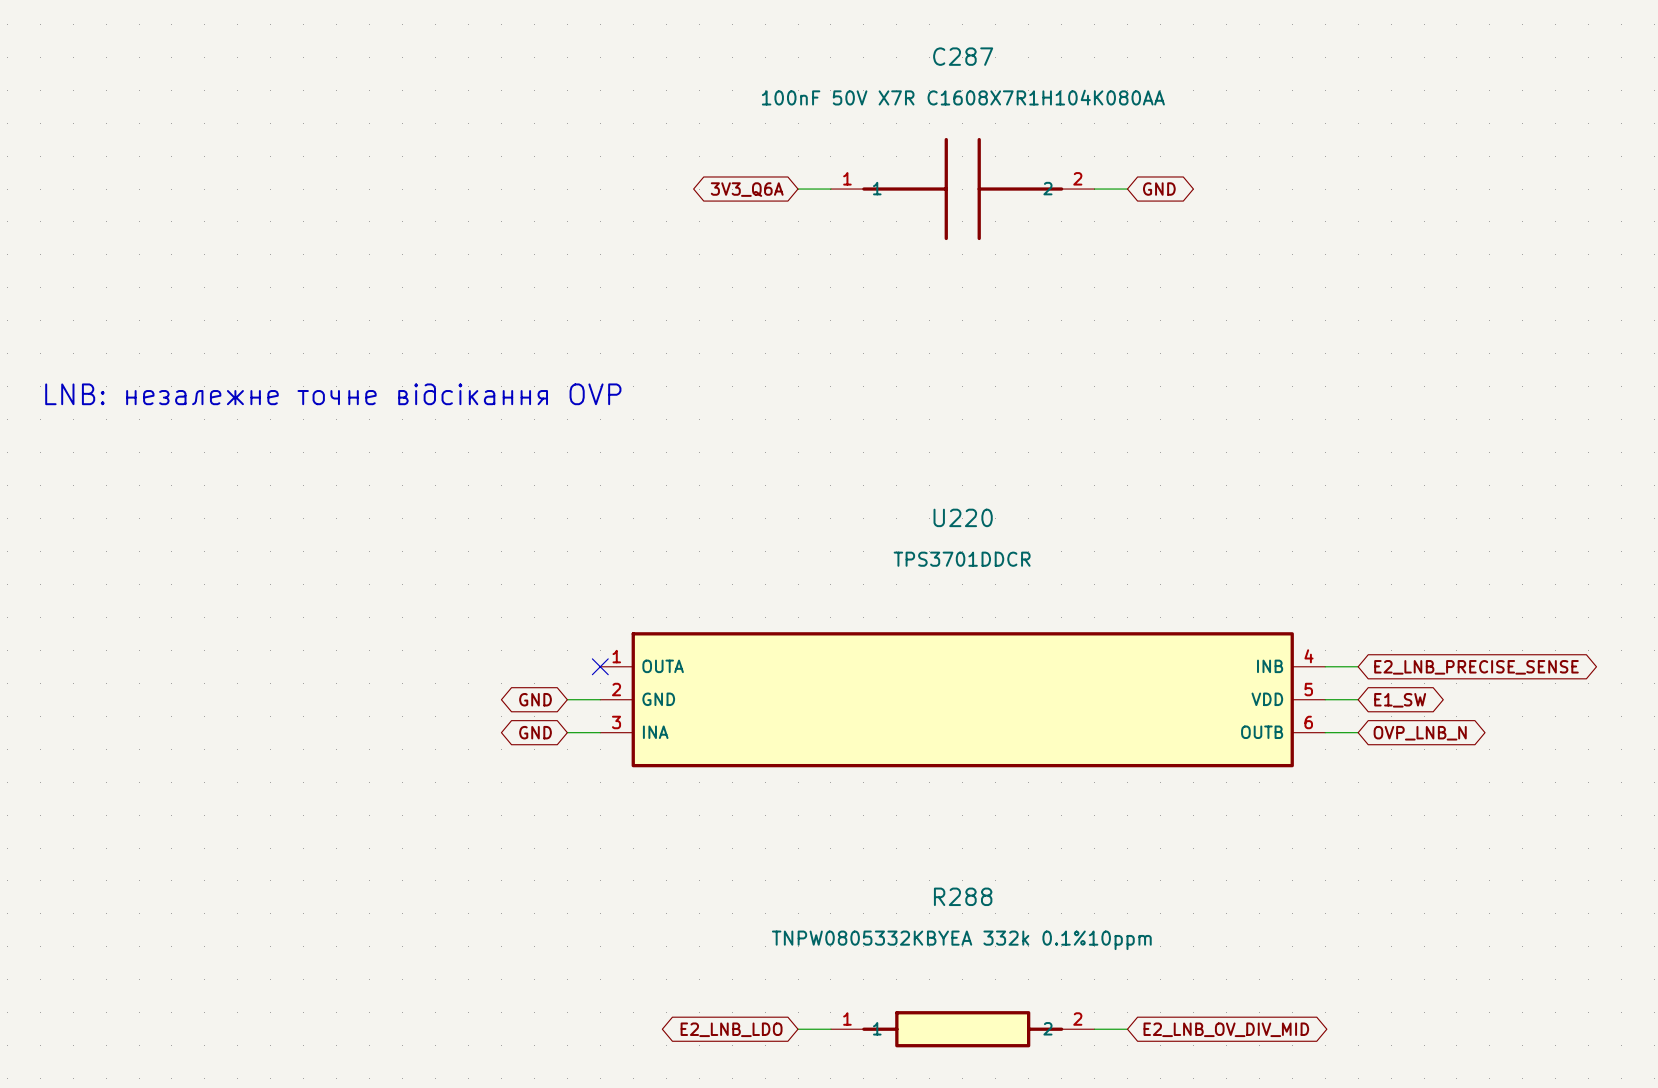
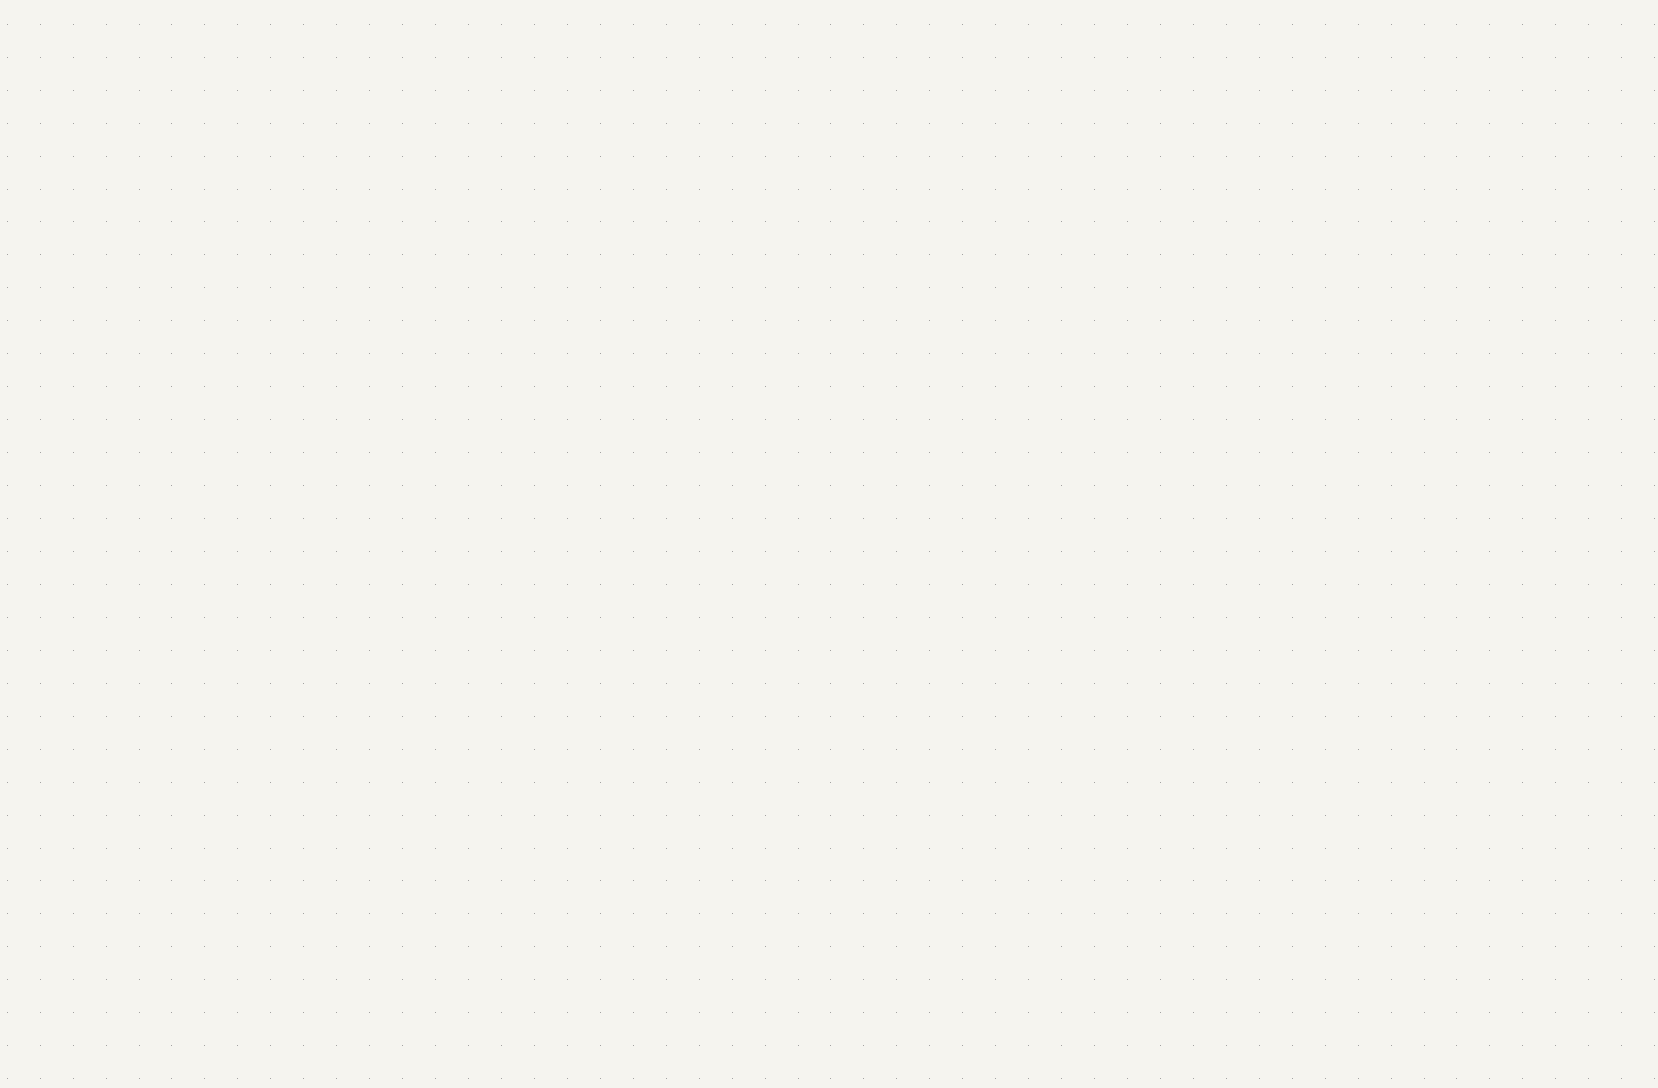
global label: 3V3_Q6A (747, 189) -> none
wire: (798, 189) (830, 189) -> none
C287: 100nF 50V X7R C1608X7R1H104K080AA (962, 189) -> none
wire: (1094, 189) (1127, 189) -> none
global label: GND (1159, 189) -> none
text: LNB: незалежне точне відсікання OVP (333, 394) -> none
no-connect mark: (600, 666) -> none
wire: (1325, 666) (1358, 666) -> none
global label: E2_LNB_PRECISE_SENSE (1476, 667) -> none
global label: GND (535, 699) -> none
wire: (567, 699) (600, 699) -> none
U220: TPS3701DDCR (962, 699) -> none
wire: (1325, 699) (1358, 699) -> none
global label: E1_SW (1400, 700) -> none
global label: GND (535, 732) -> none
wire: (567, 732) (600, 732) -> none
wire: (1325, 732) (1358, 732) -> none
global label: OVP_LNB_N (1420, 733) -> none
global label: E2_LNB_LDO (731, 1029) -> none
wire: (798, 1029) (830, 1029) -> none
R288: TNPW0805332KBYEA 332k 0.1%10ppm (962, 1029) -> none
wire: (1094, 1029) (1127, 1029) -> none
global label: E2_LNB_OV_DIV_MID (1226, 1029) -> none

